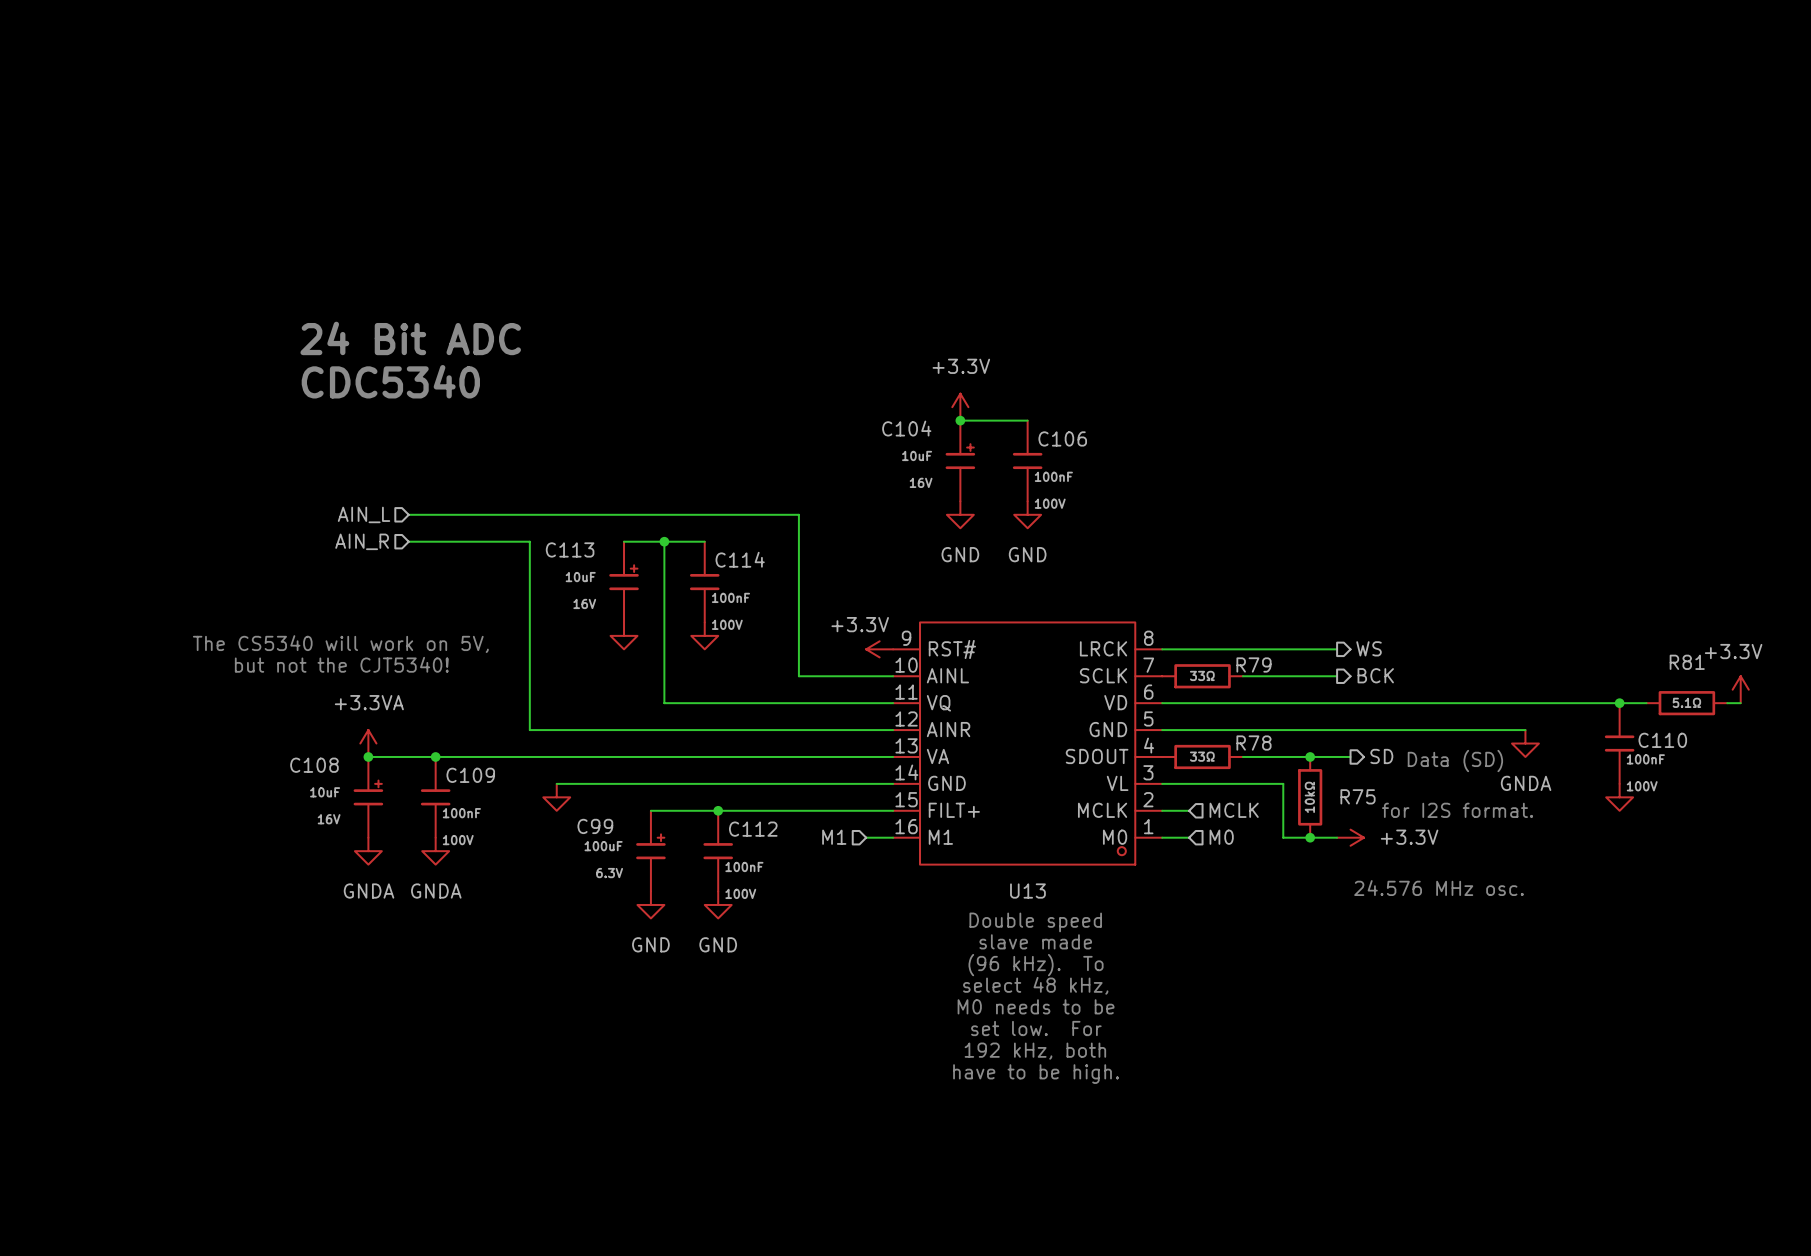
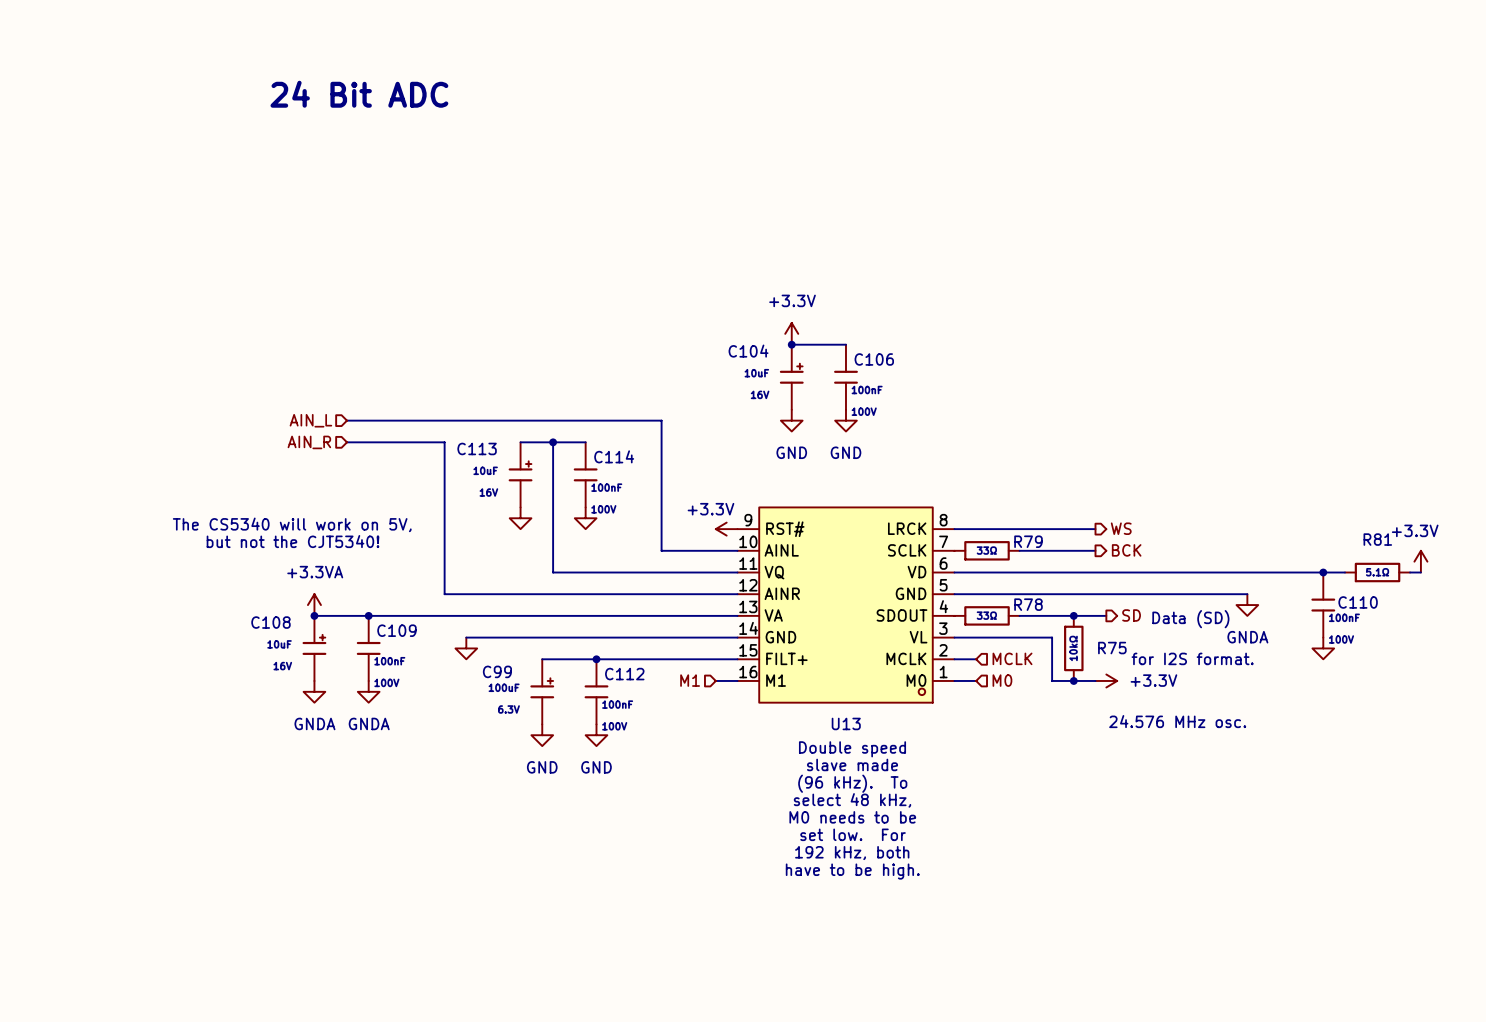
text position: 24 Bit ADC (410, 338) -> 24 Bit ADC (359, 94)
text: CDC5340 (390, 381) -> none

